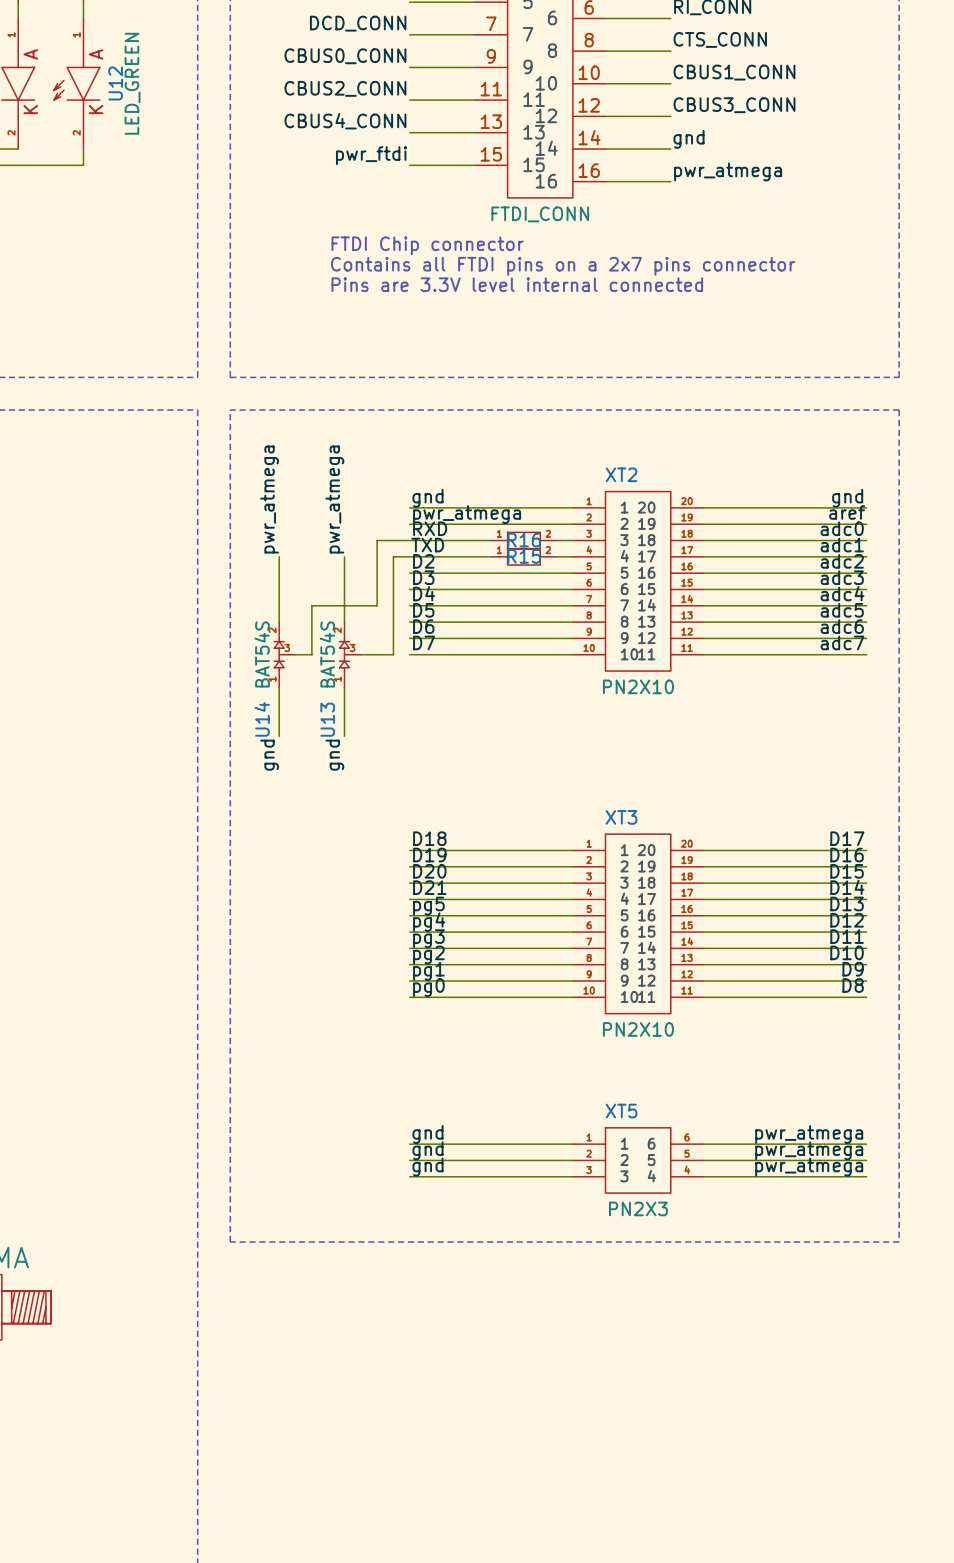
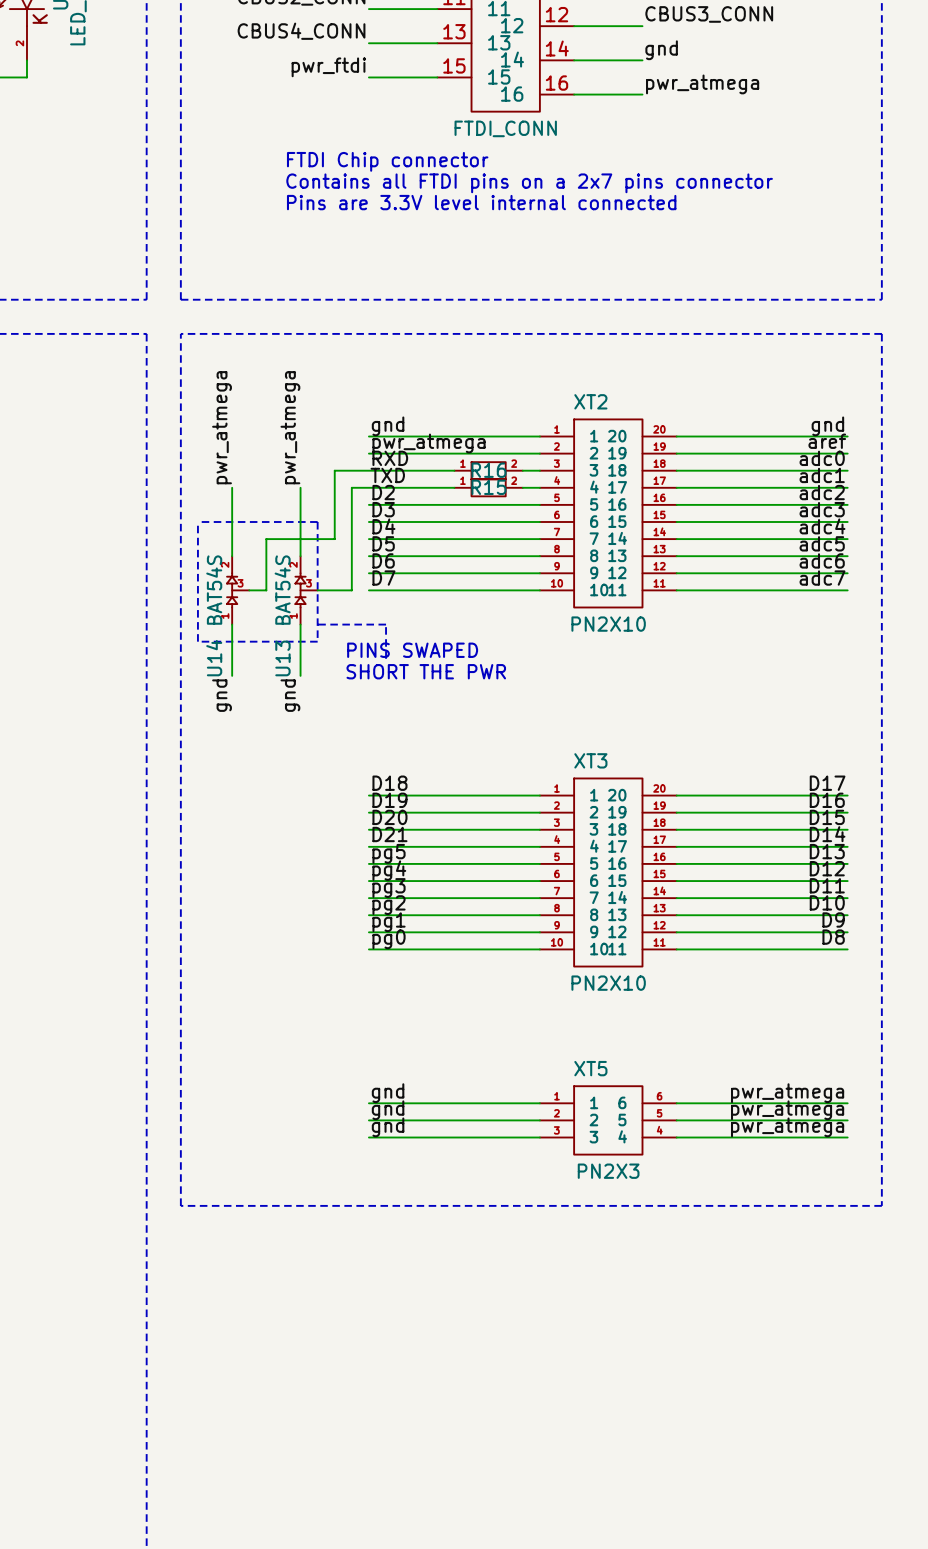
line: none -> (197, 521) (317, 521) (317, 641) (197, 641) (197, 521)
line: none -> (317, 624) (386, 624) (386, 658)
text: none -> PINS SWAPED (412, 650)
text: none -> SHORT THE PWR (426, 671)

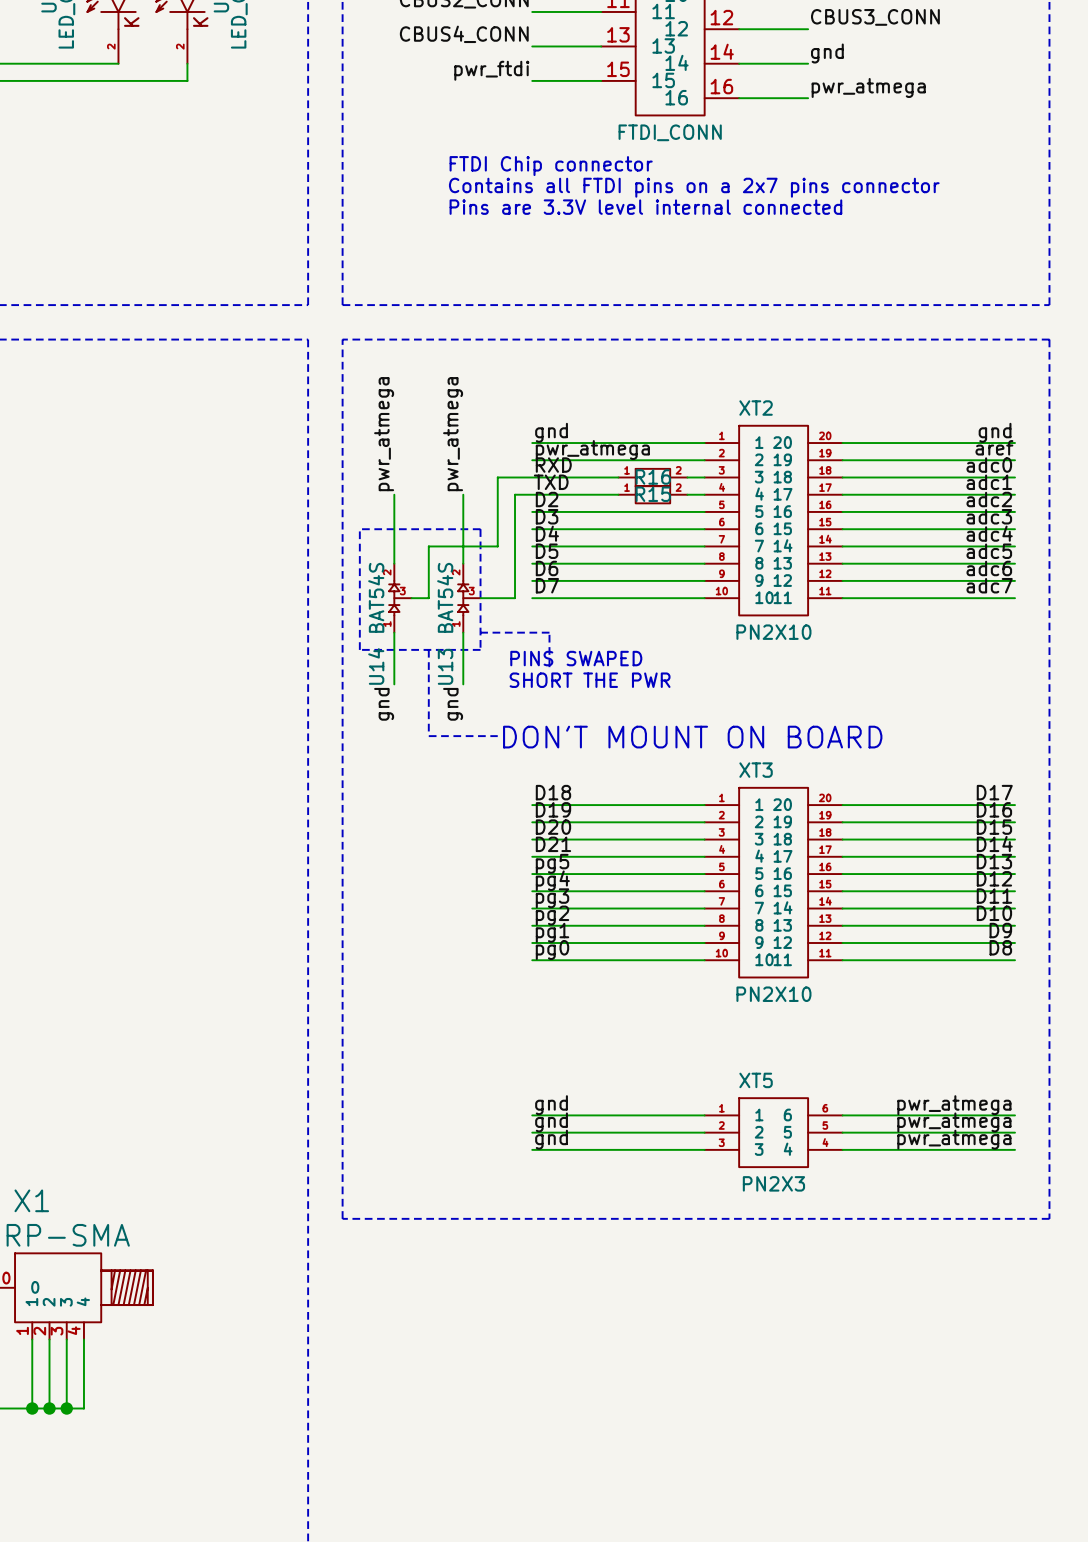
line: none -> (428, 649) (428, 736) (497, 736)
text: none -> DON'T MOUNT ON BOARD (692, 737)

